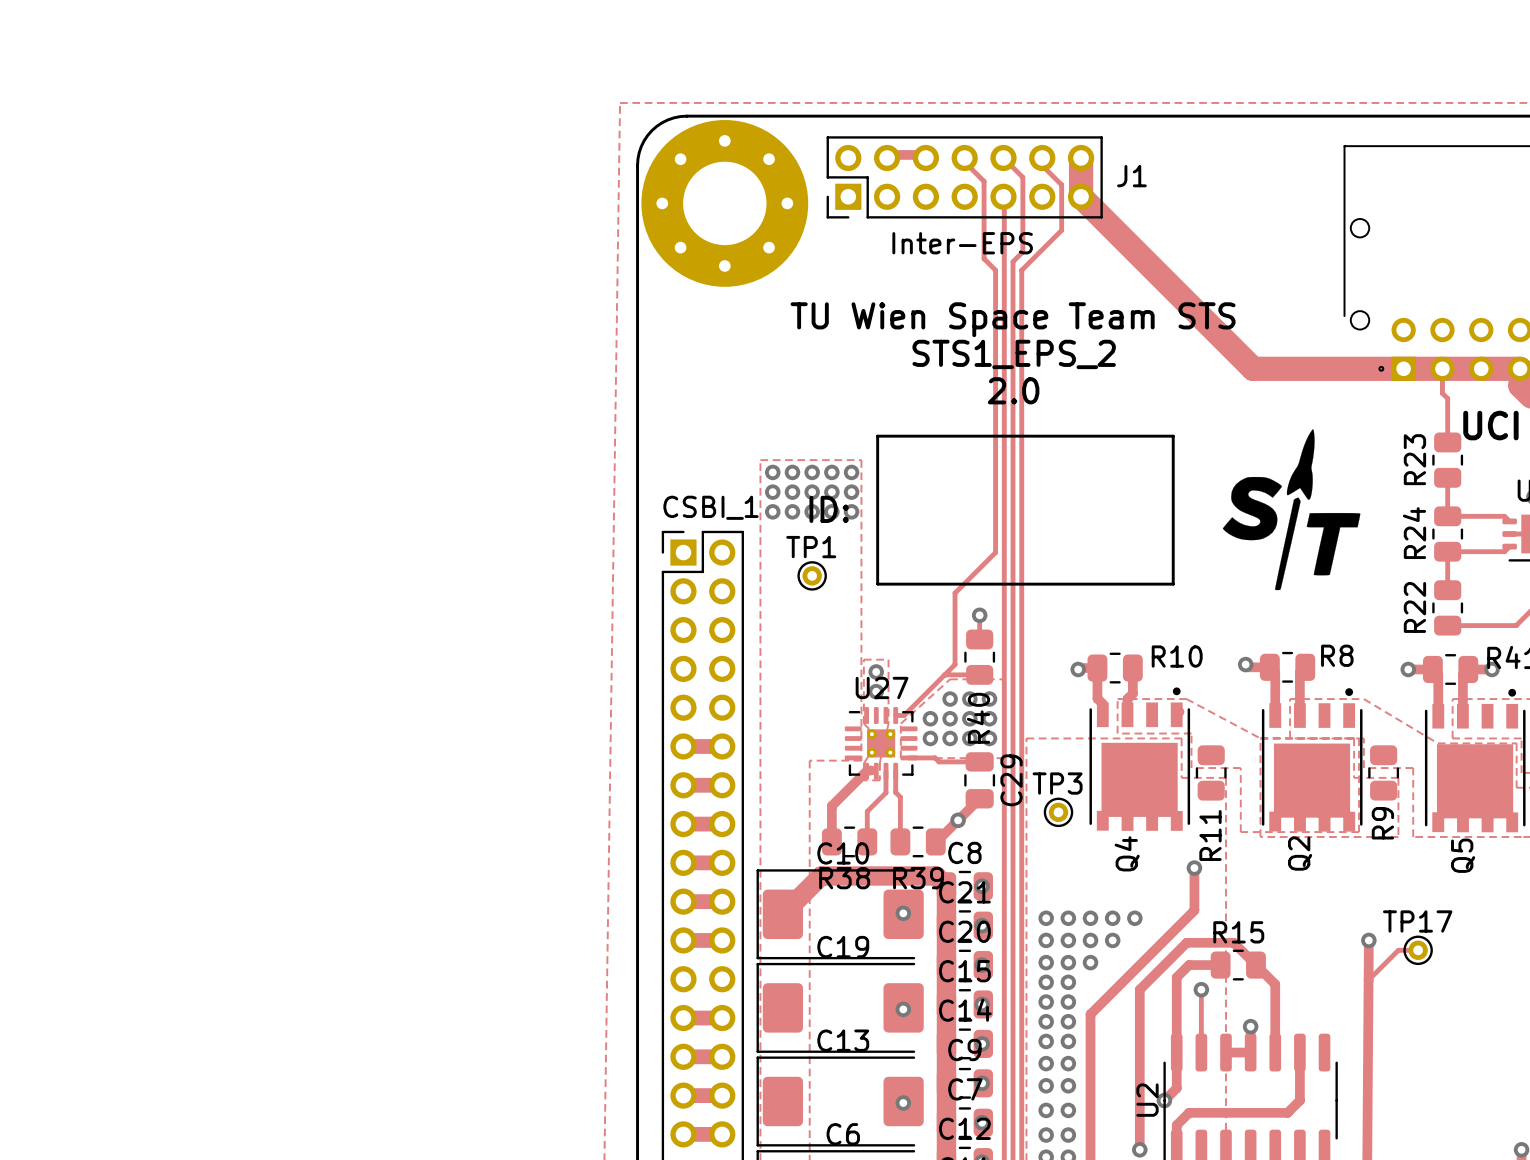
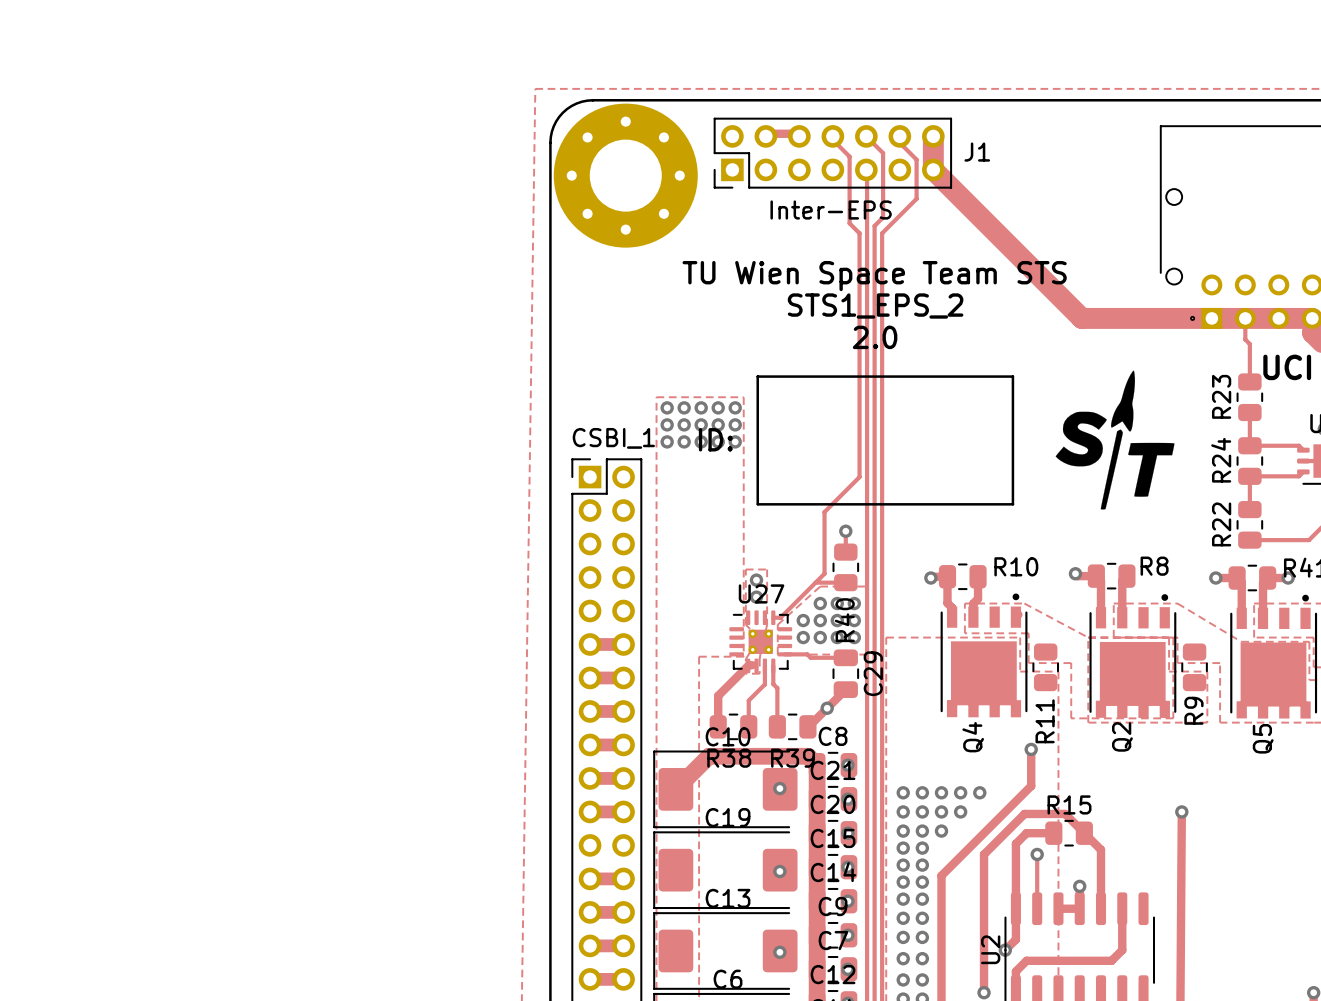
TP1: (812, 575) -> none
TP3: (1058, 812) -> none
track: (1418, 950) (1398, 950) (1368, 980) -> none
TP17: (1418, 950) -> none

